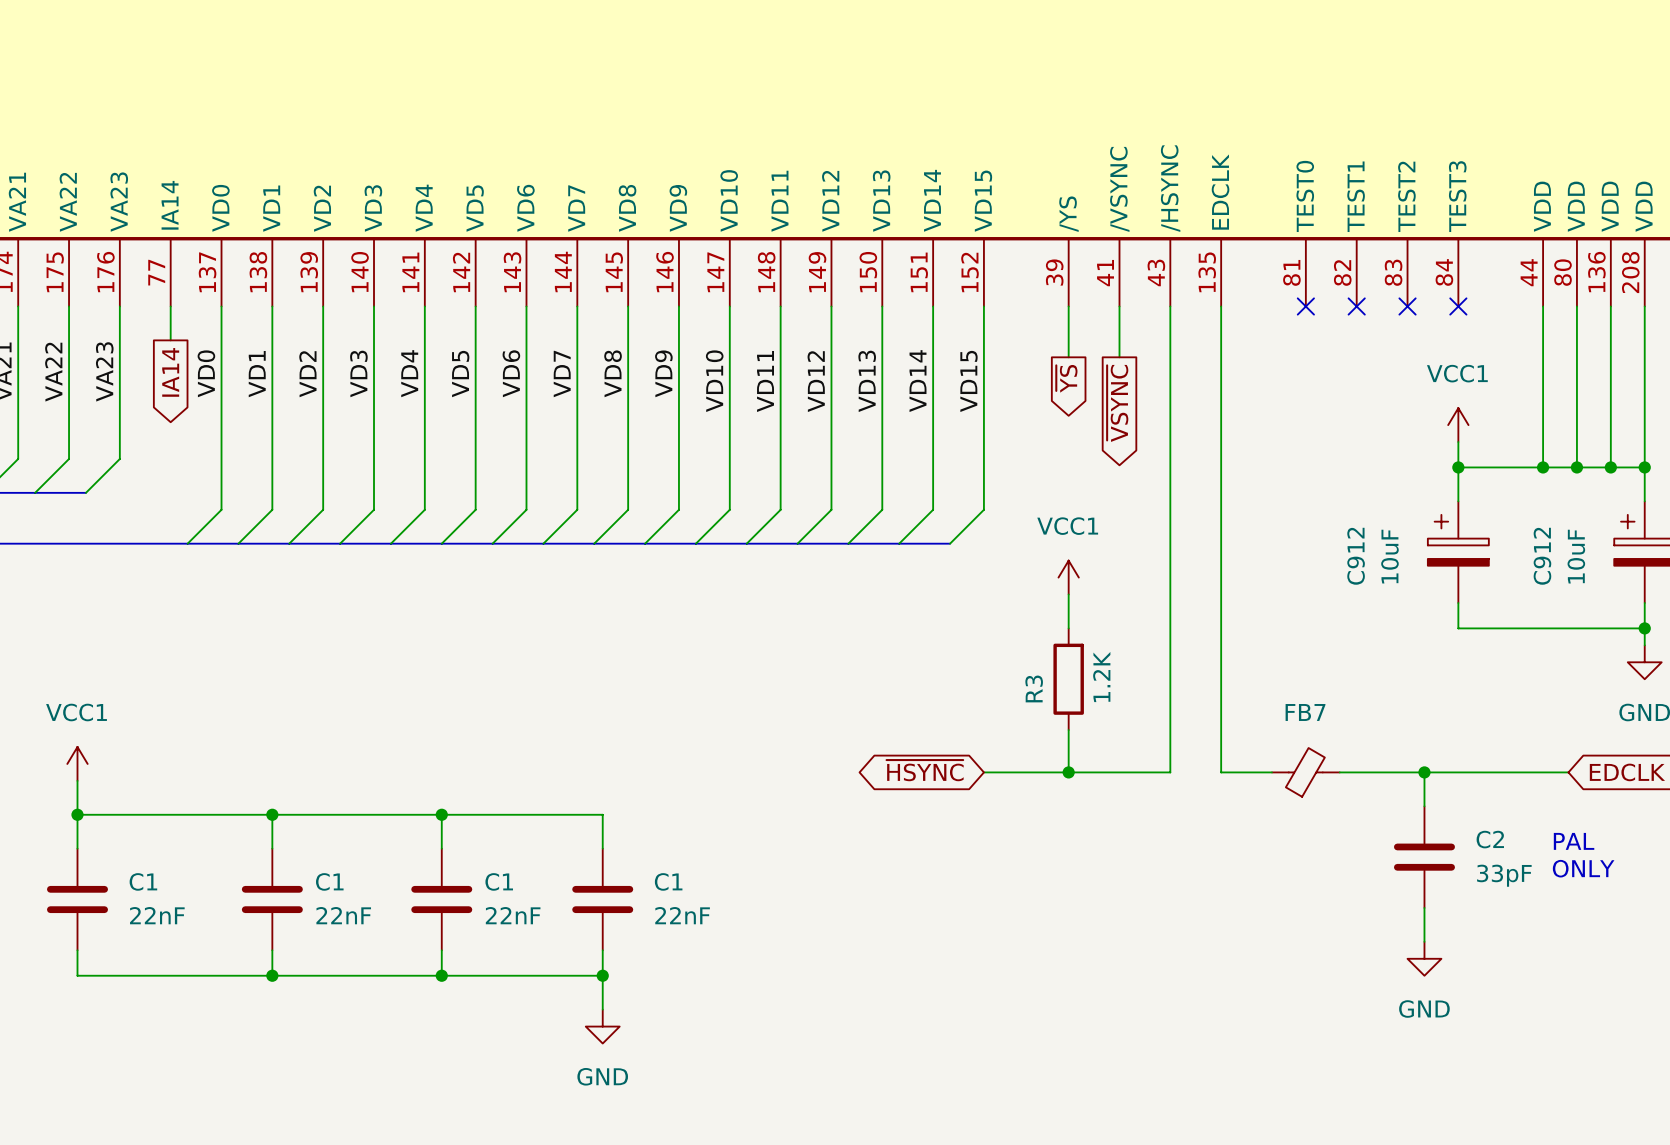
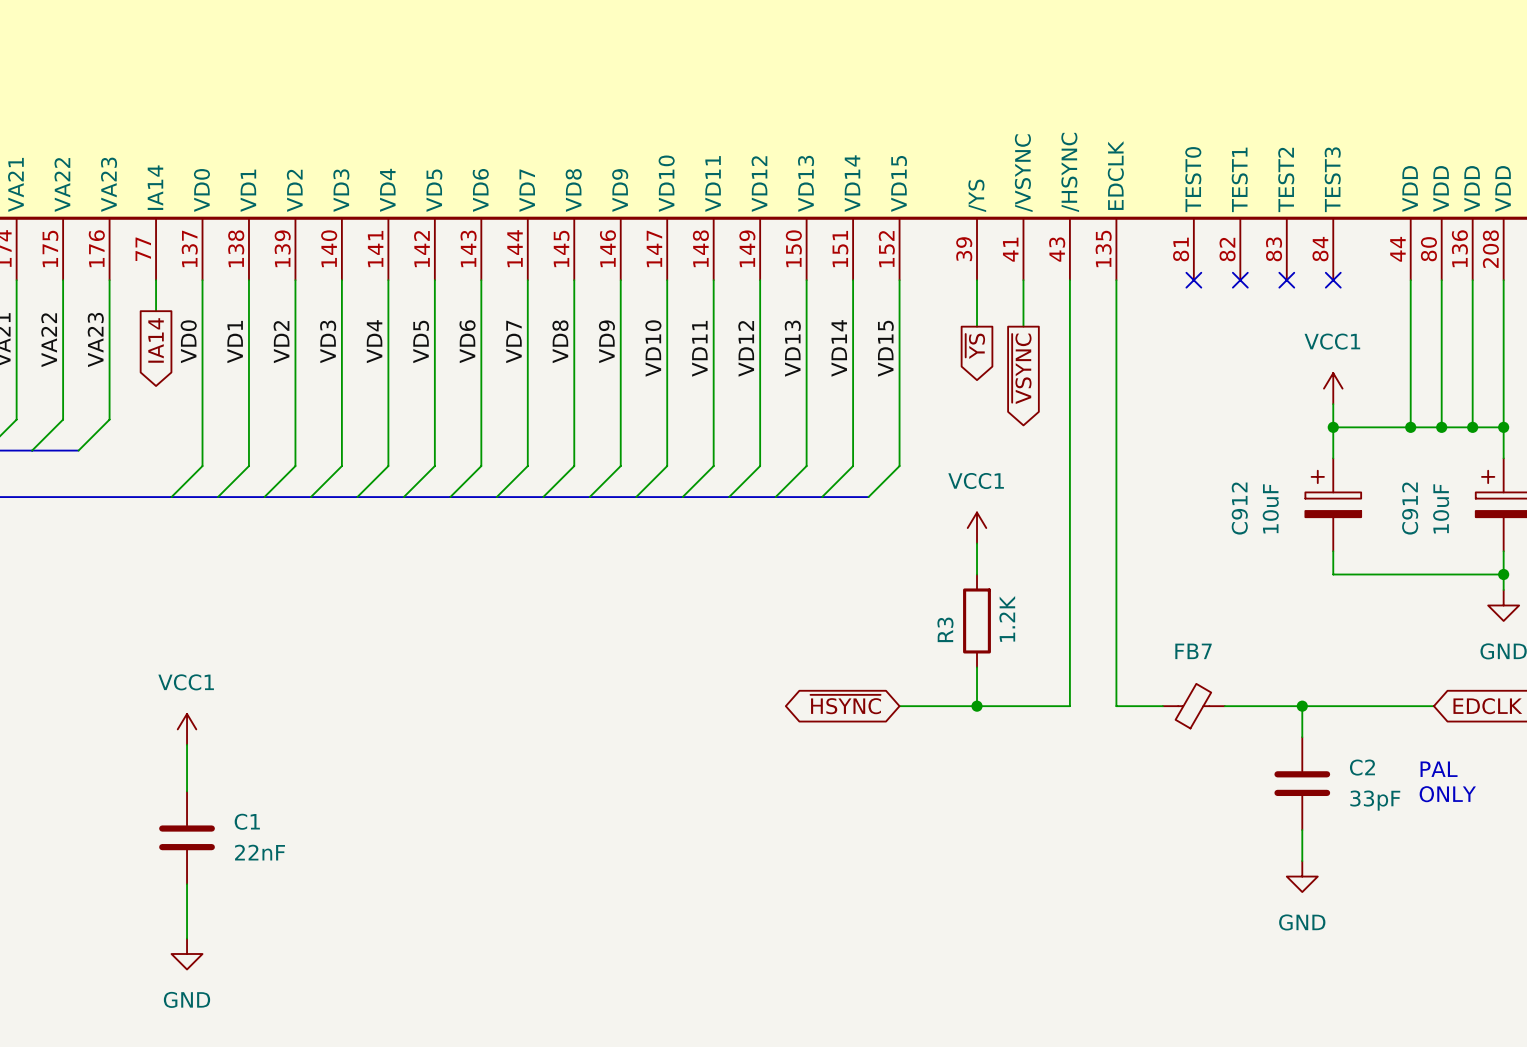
power symbol position: VCC1 (77, 763) -> VCC1 (187, 729)
wire: (77, 780) (77, 848) -> none
wire: (77, 814) (602, 814) (602, 848) -> none
junction: (77, 814) -> none
wire: none -> (187, 744) (187, 791)
wire: (272, 814) (272, 848) -> none
junction: (272, 814) -> none
wire: (441, 814) (441, 848) -> none
junction: (441, 814) -> none
C1: 22nF (77, 899) -> none
C1: 22nF (272, 899) -> none
C1: 22nF (441, 899) -> none
C1: 22nF (602, 899) -> none
C1: none -> 22nF (187, 837)
wire: (77, 950) (77, 975) (602, 975) -> none
wire: (272, 950) (272, 975) -> none
wire: (441, 950) (441, 975) -> none
wire: (602, 950) (602, 1009) -> none
wire: none -> (187, 884) (187, 938)
junction: (272, 975) -> none
junction: (441, 975) -> none
junction: (602, 975) -> none
power symbol: GND (602, 1026) -> none
power symbol: none -> GND (187, 954)

